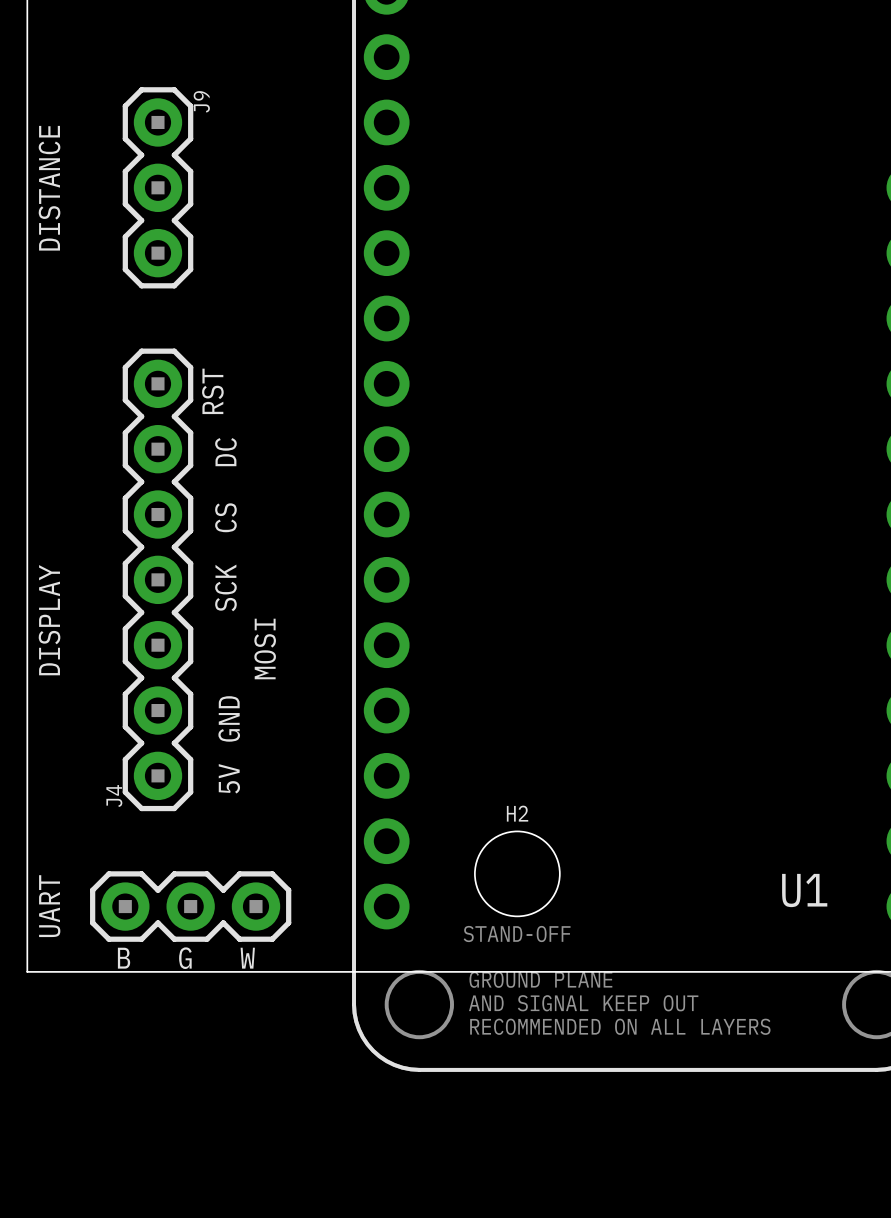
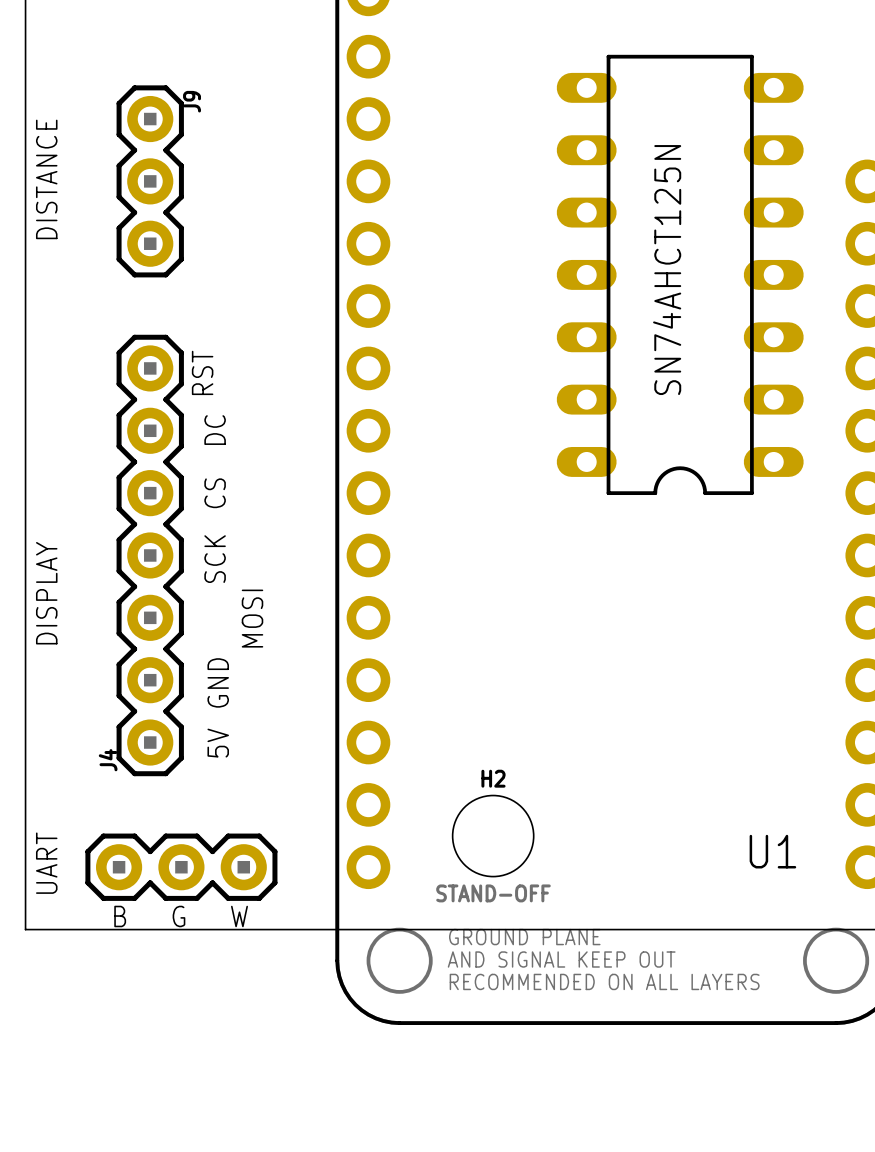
part: none -> (680, 274)
text: none -> SN74AHCT125N (667, 270)

